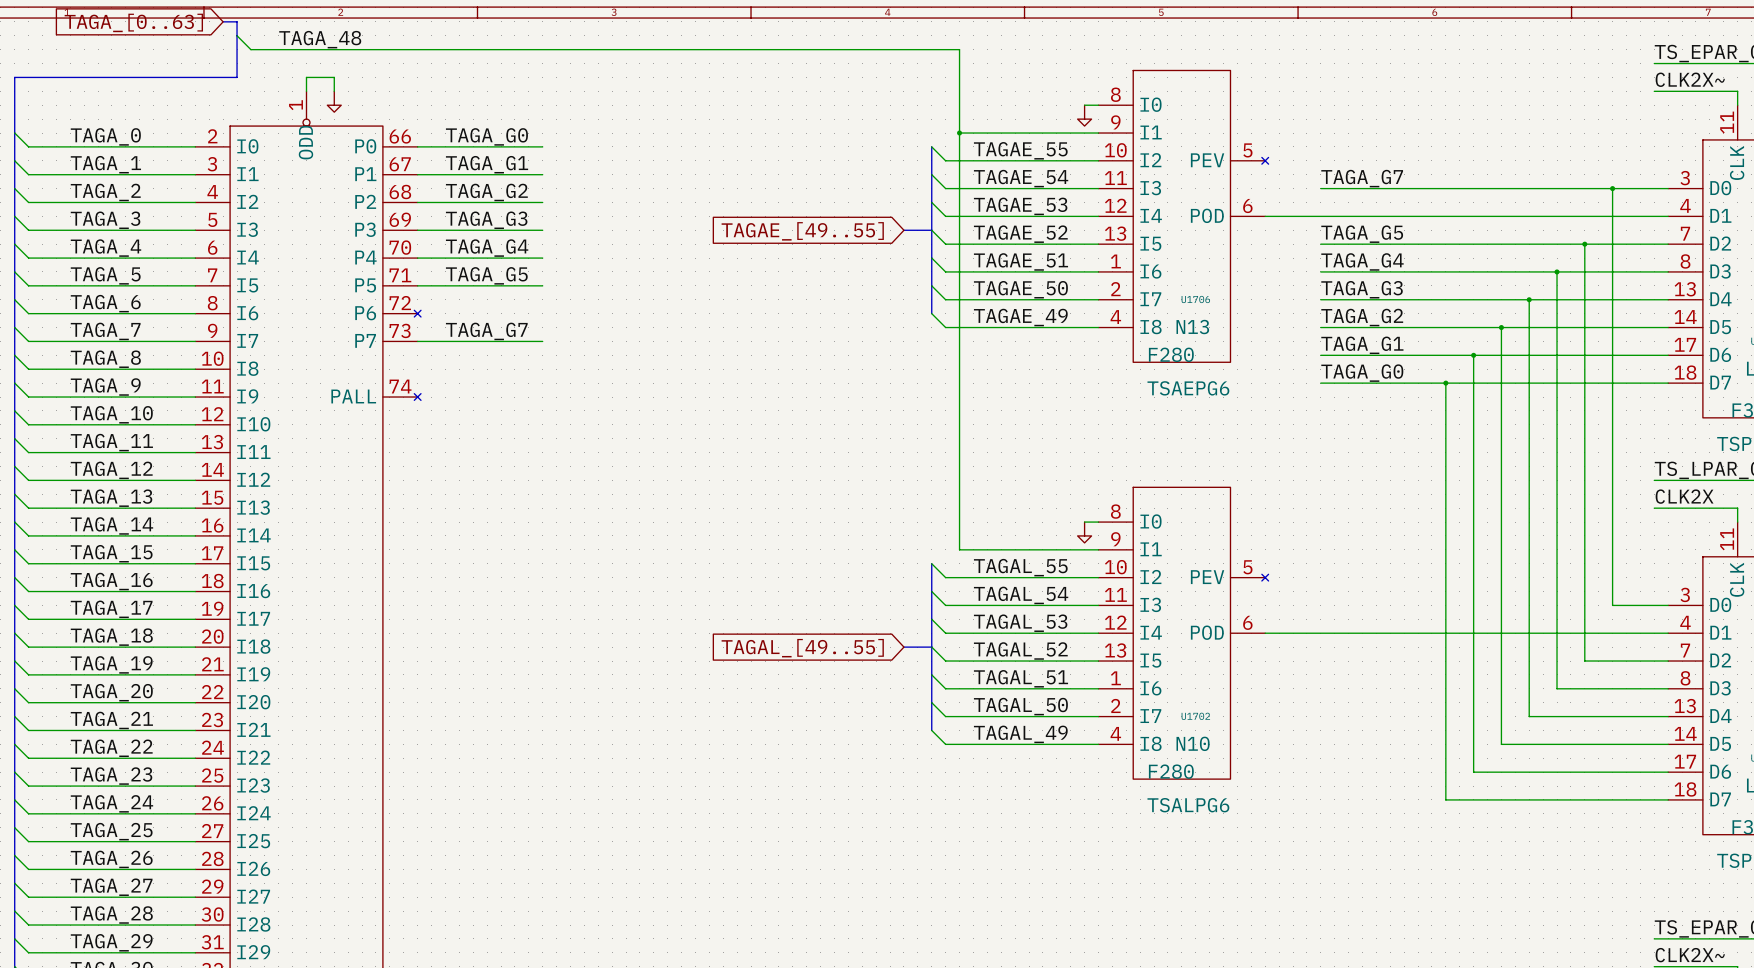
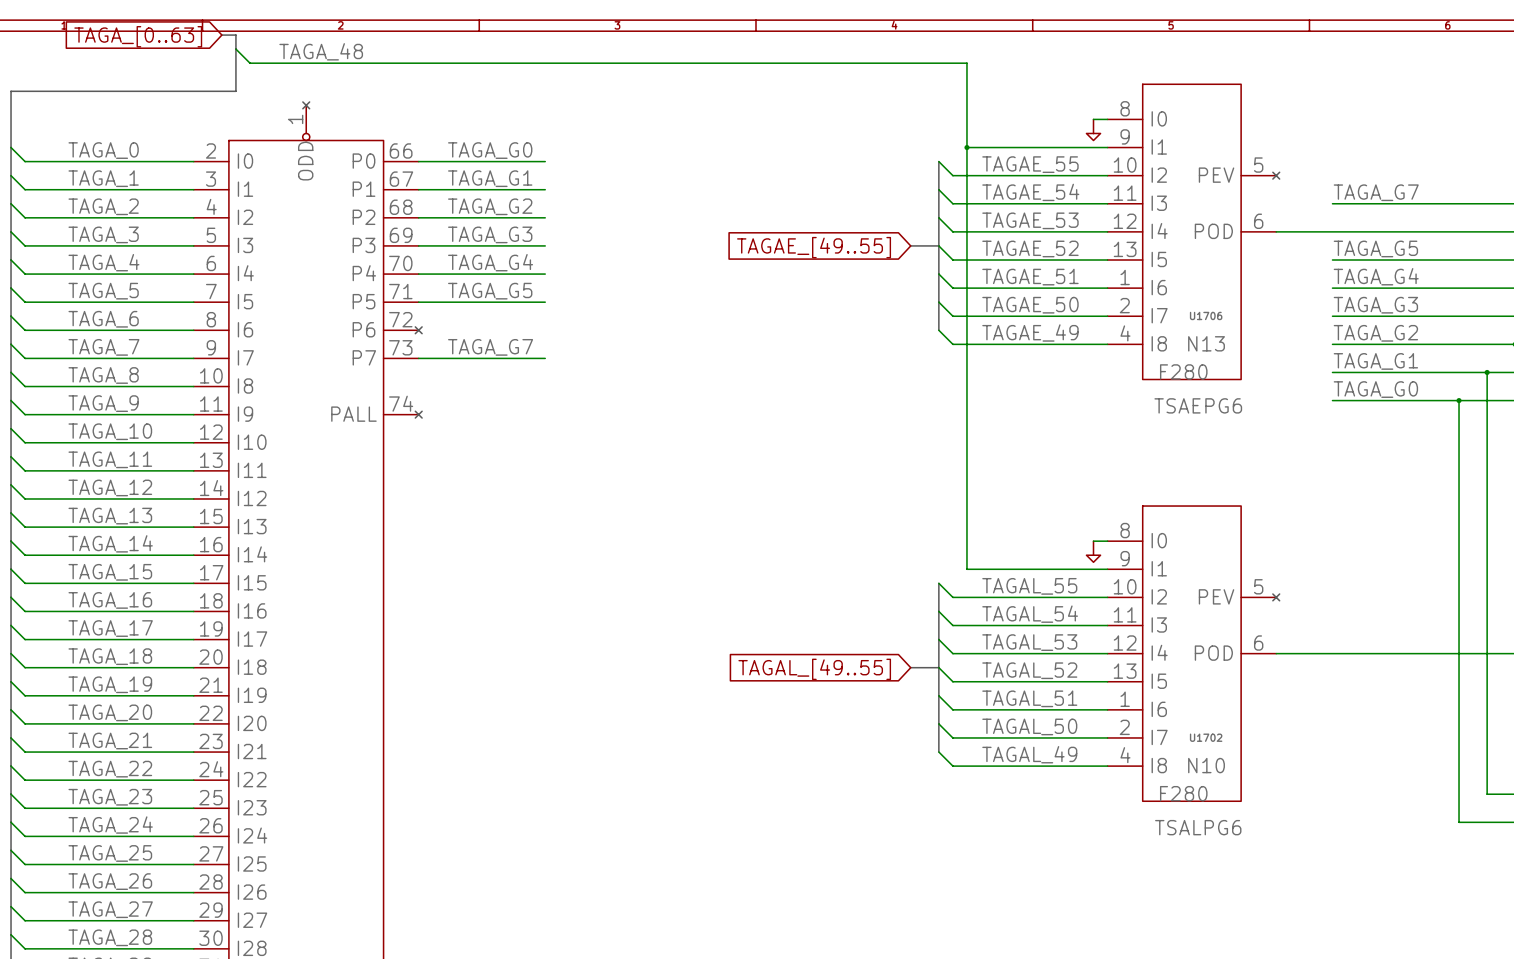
wire: (306, 91) (306, 77) (334, 77) (334, 91) -> none
no-connect mark: none -> (306, 105)
power symbol: (334, 101) -> none

